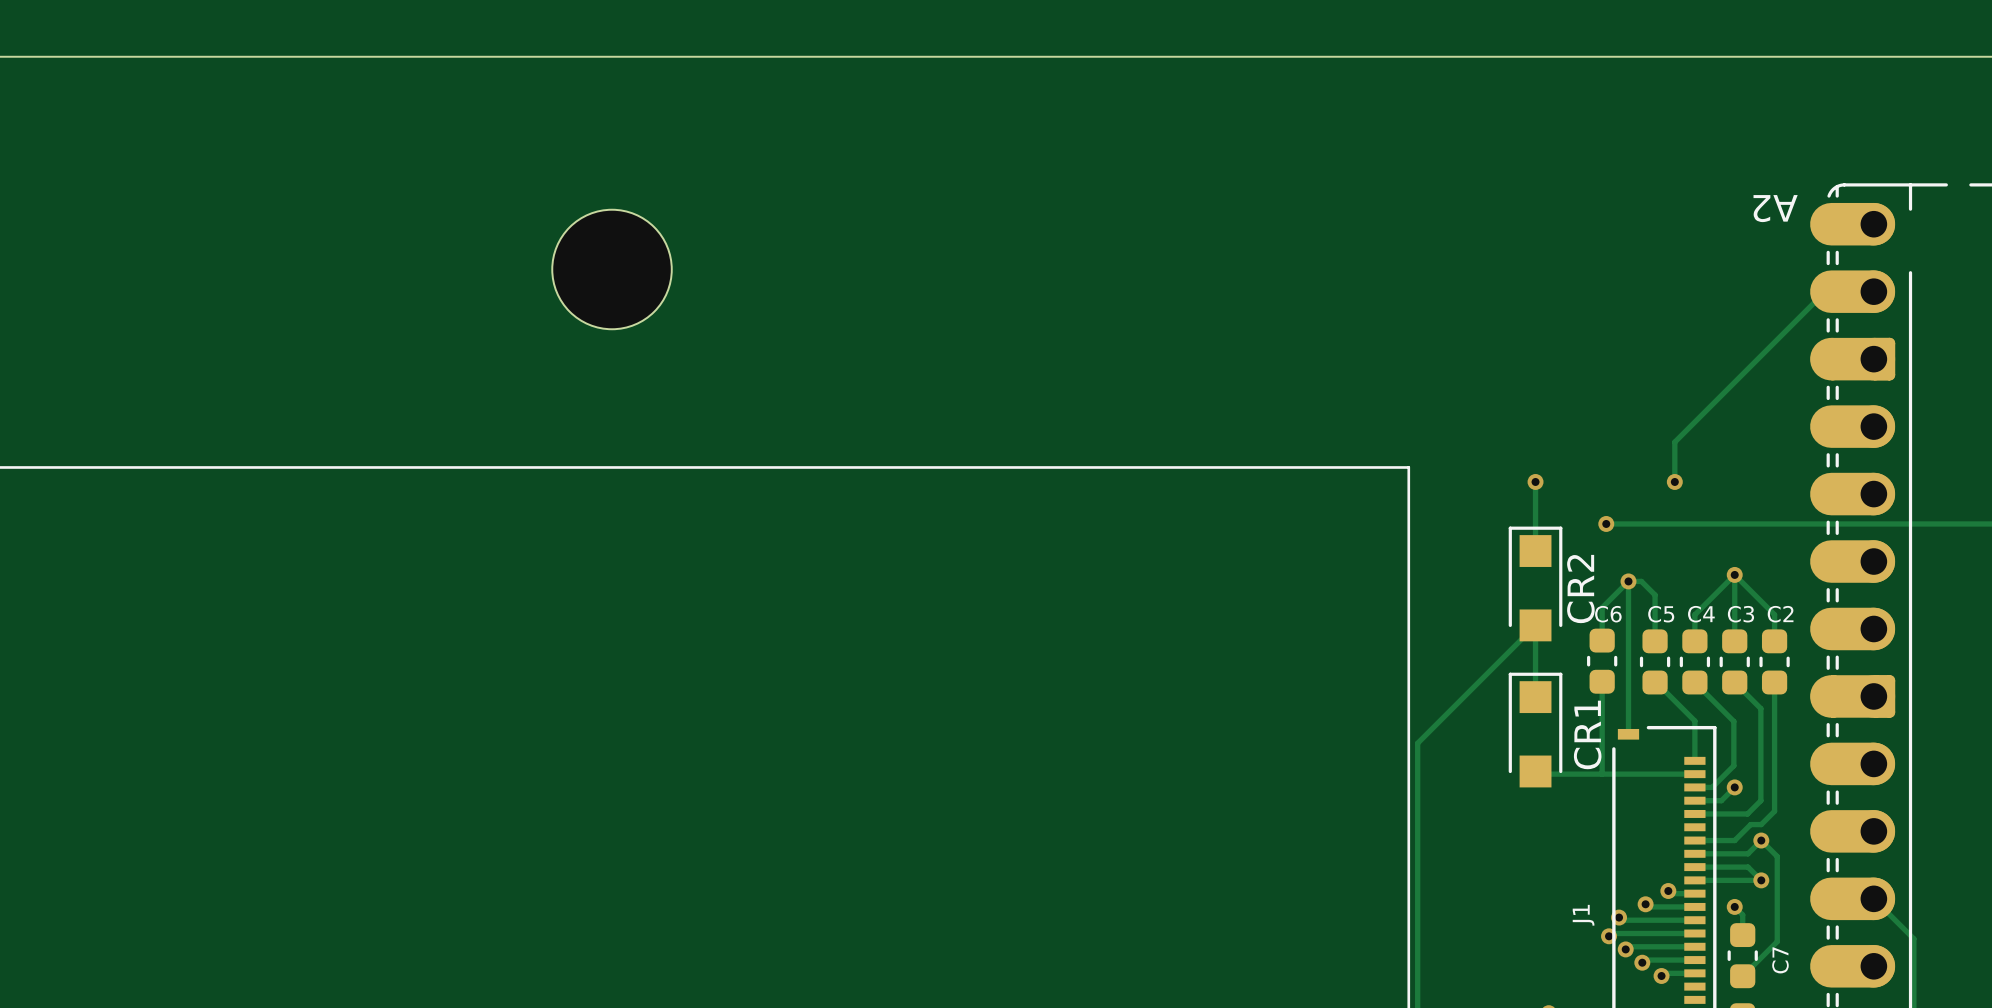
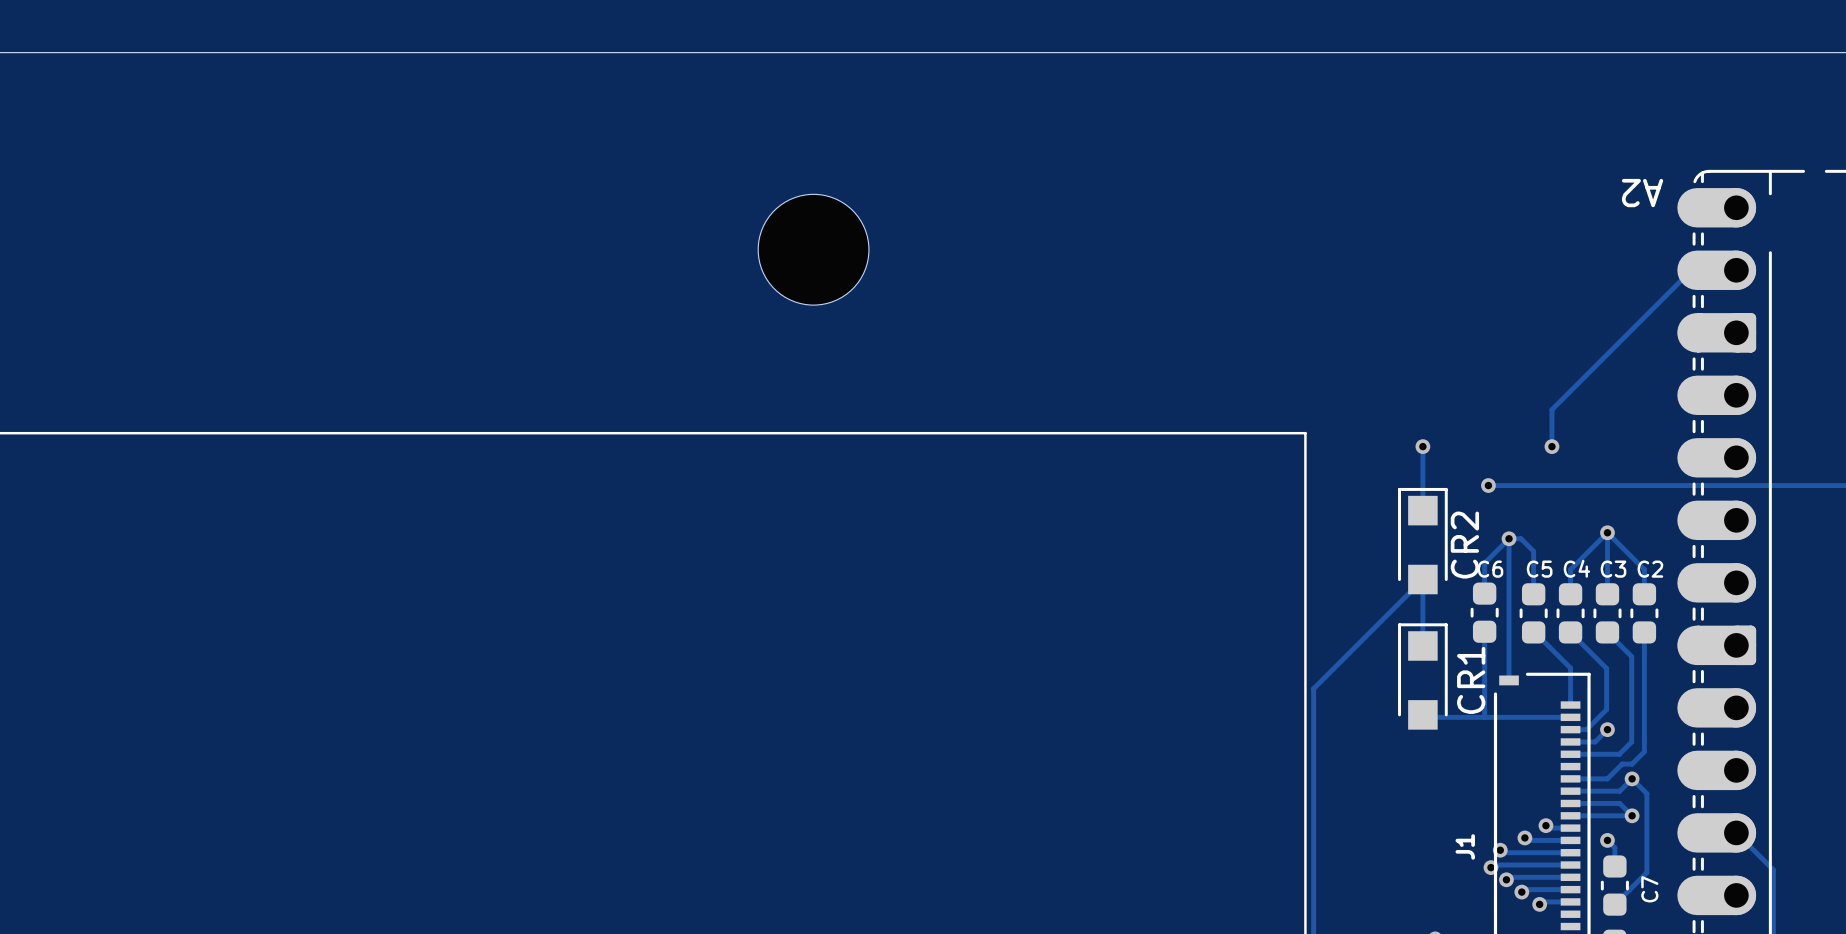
part position: (612, 269) -> (813, 249)

